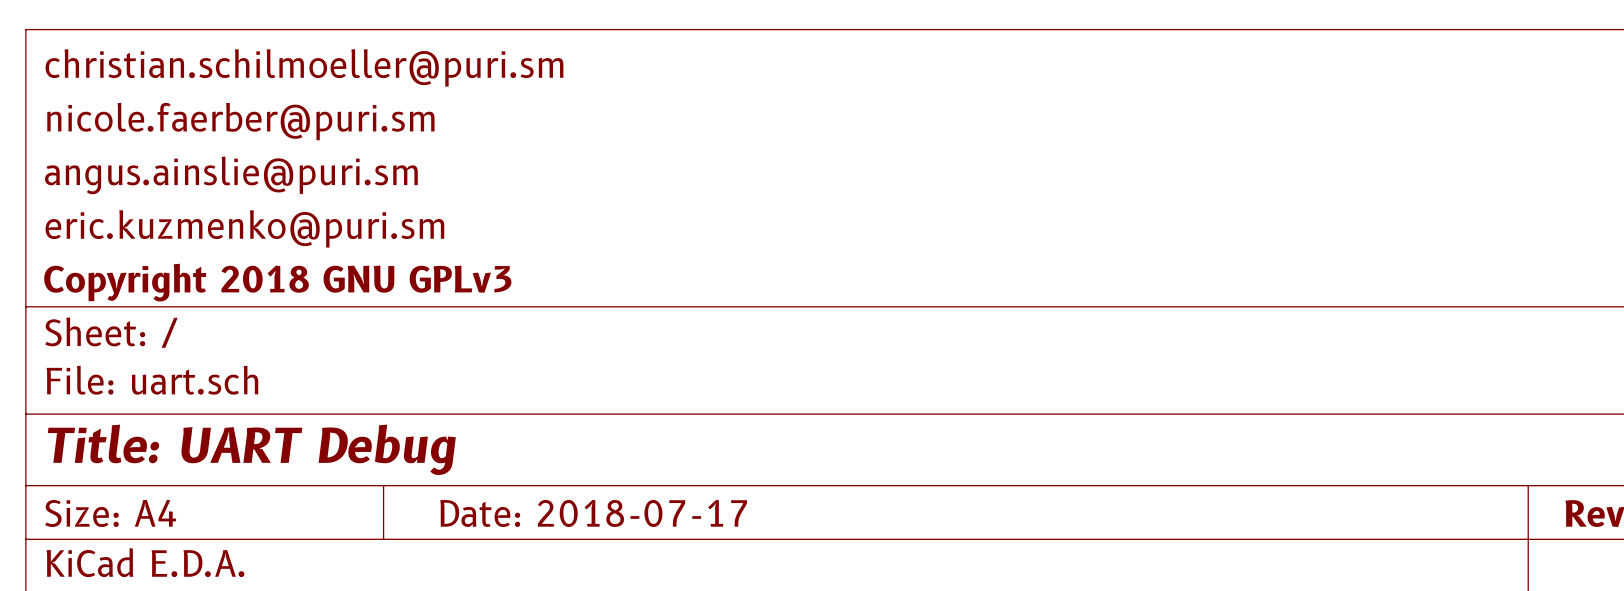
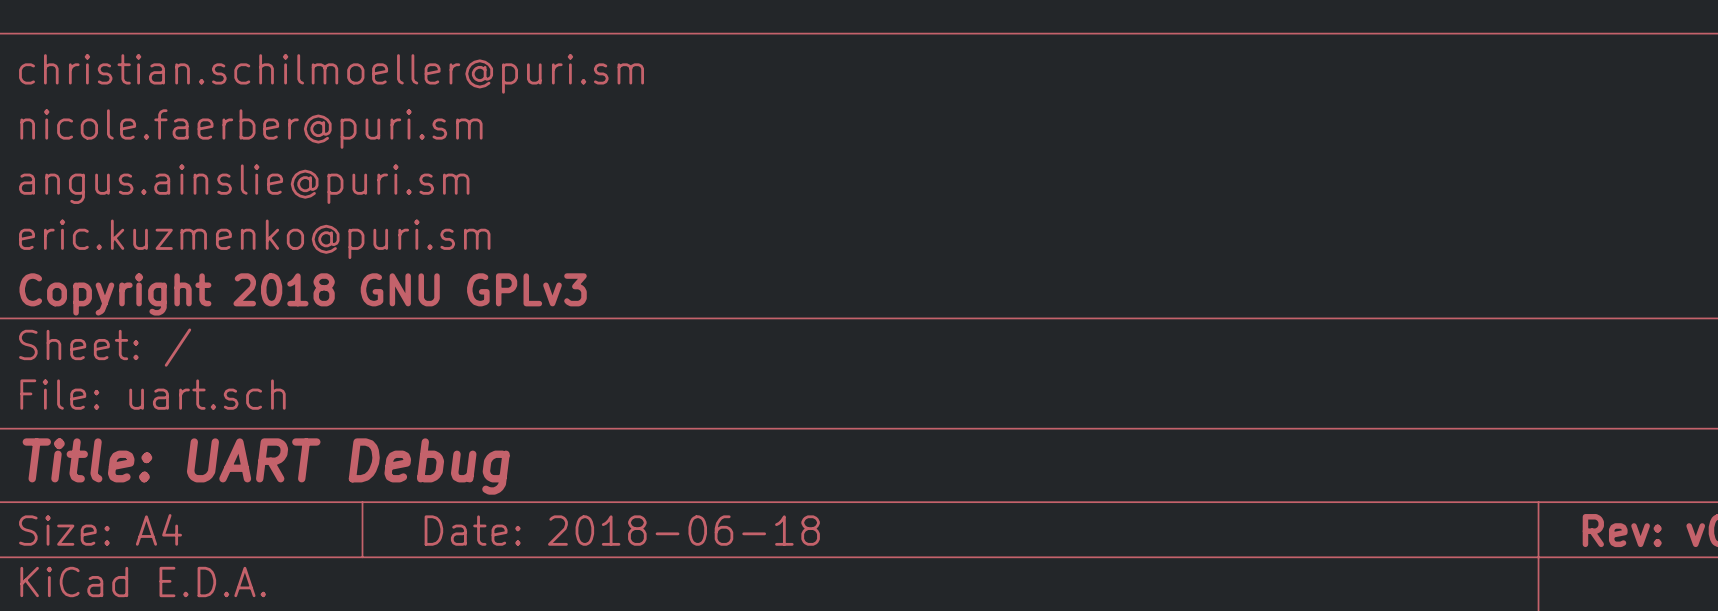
title block: Date: 2018-07-17 (593, 513) -> Date: 2018-06-18 (622, 530)

